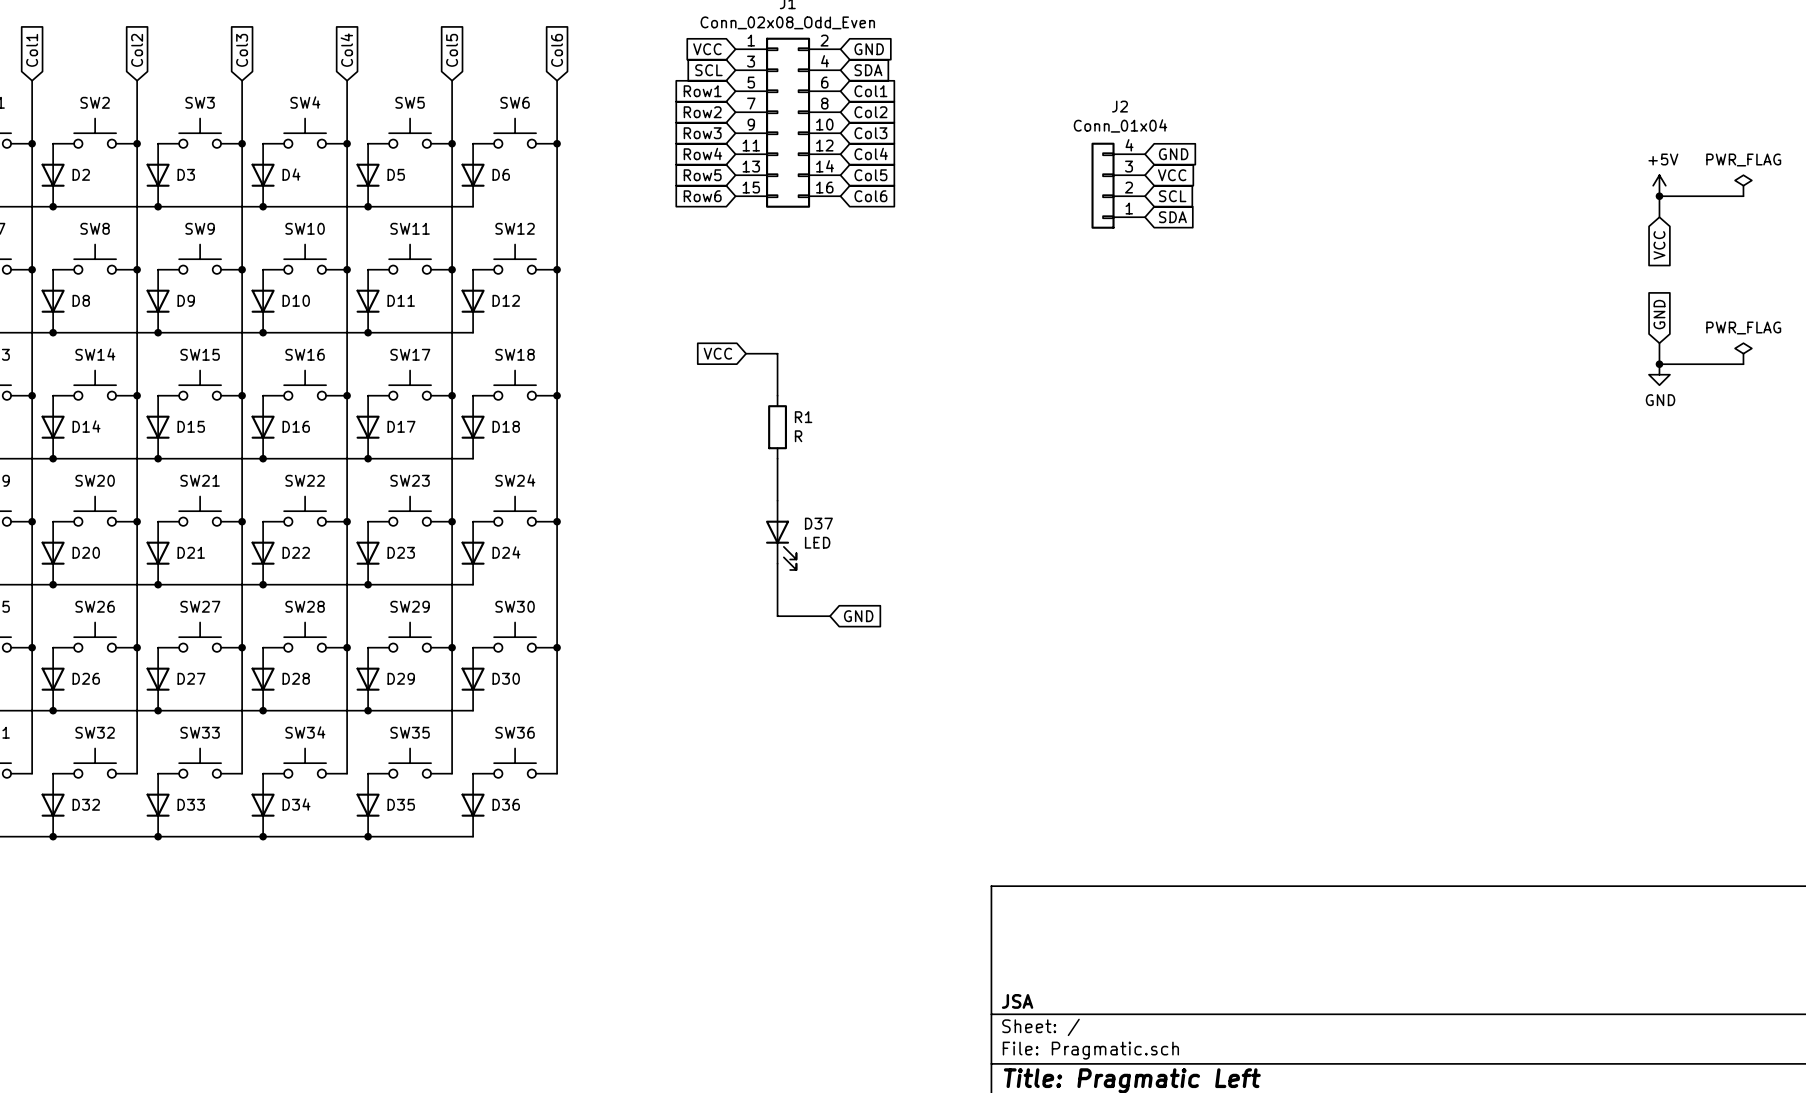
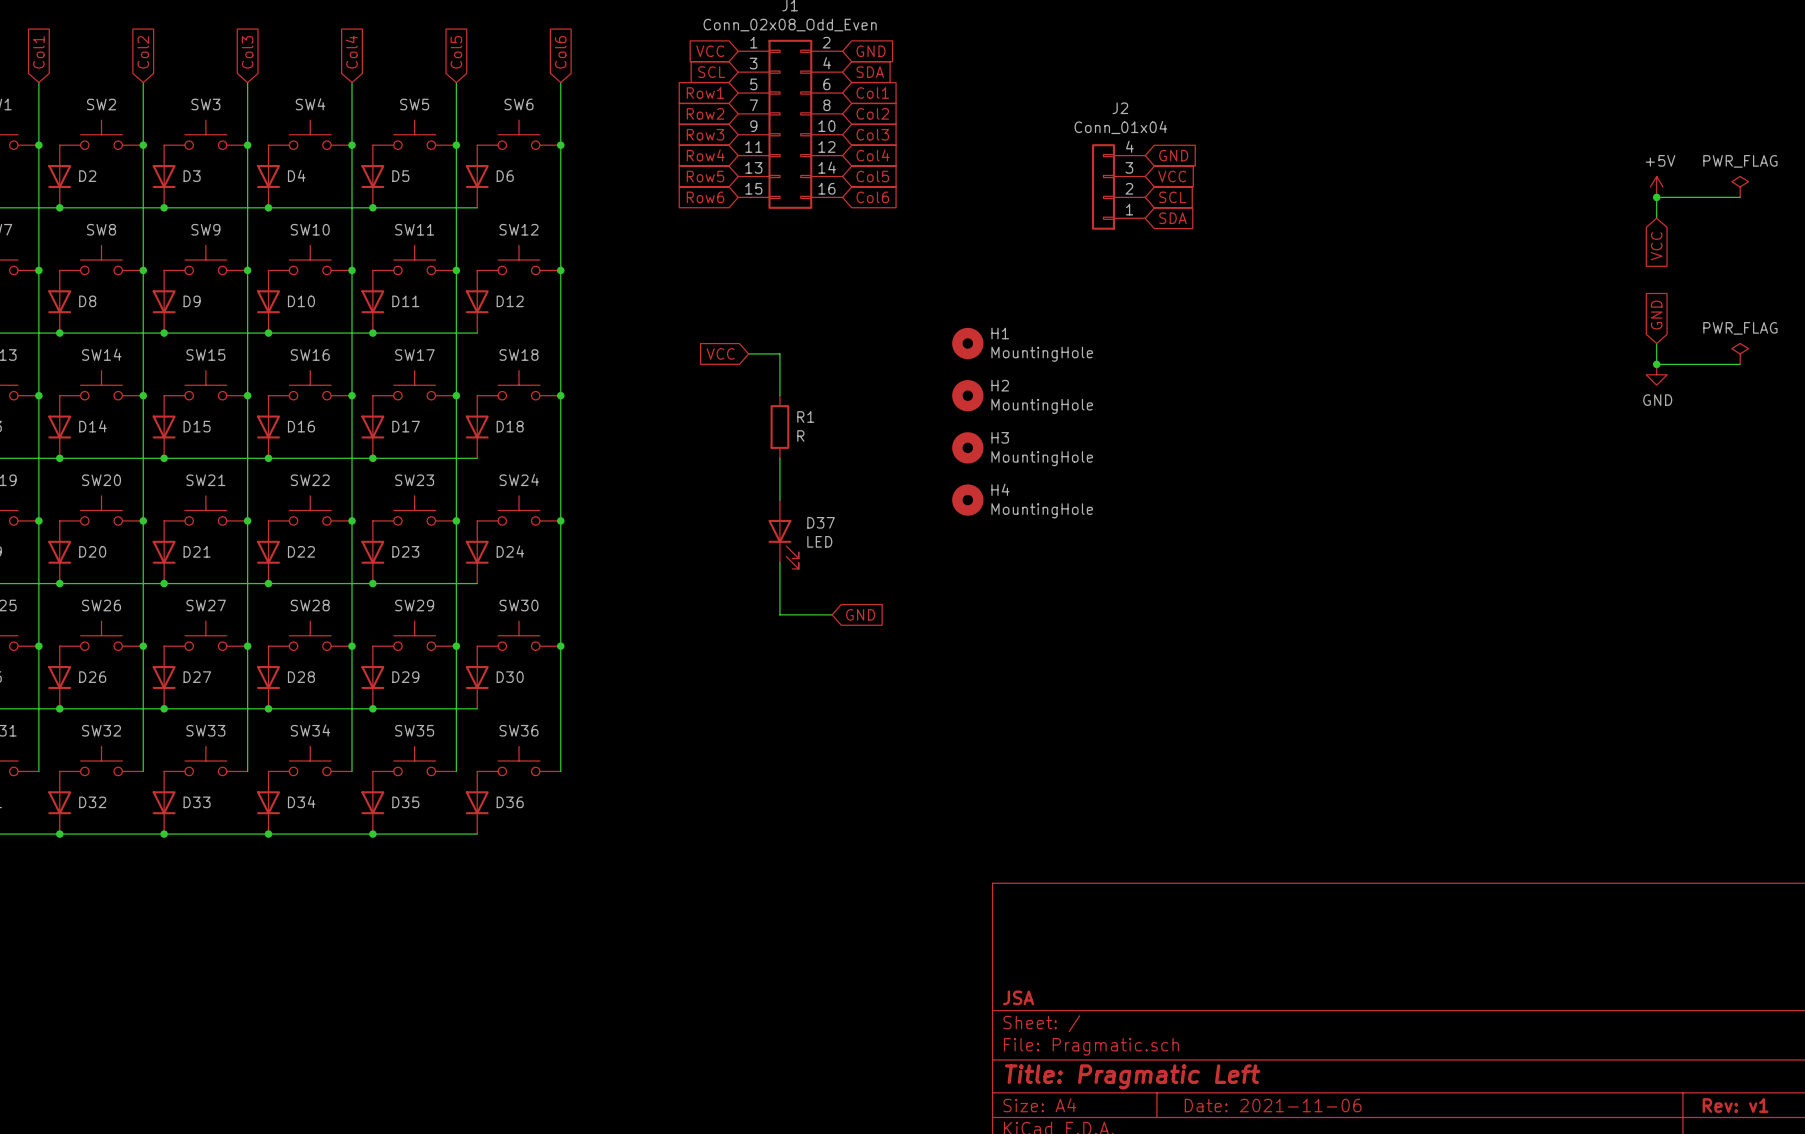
H1: none -> MountingHole (967, 343)
H2: none -> MountingHole (967, 395)
H3: none -> MountingHole (967, 447)
H4: none -> MountingHole (967, 500)

